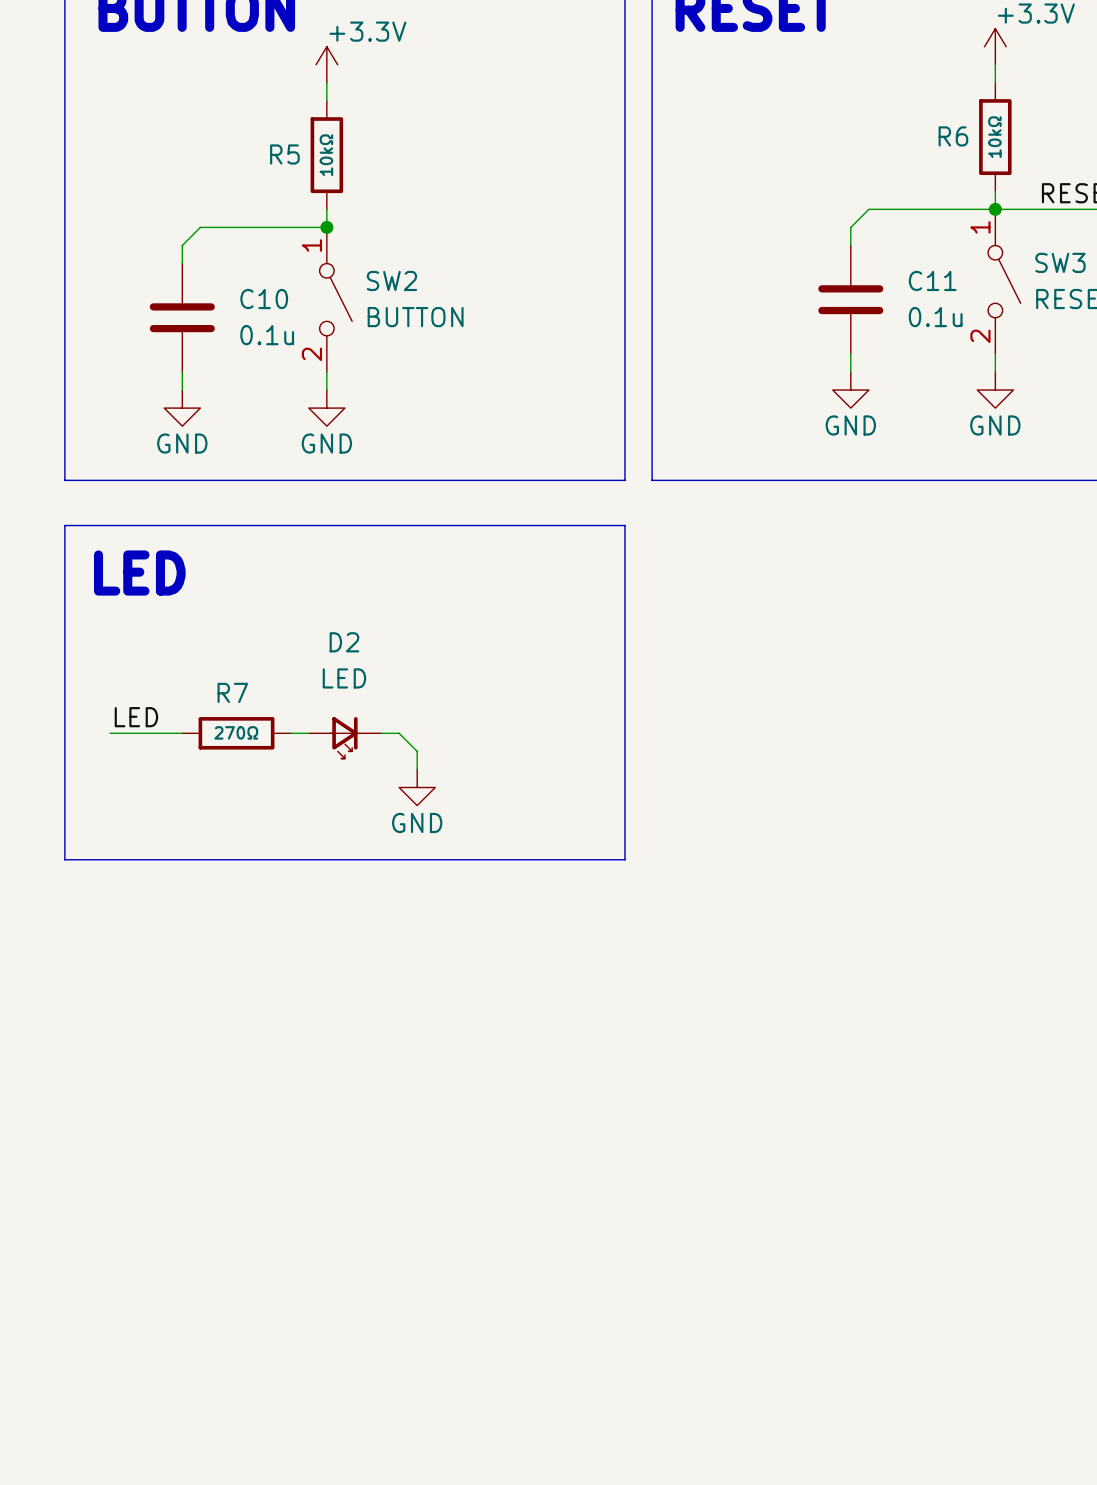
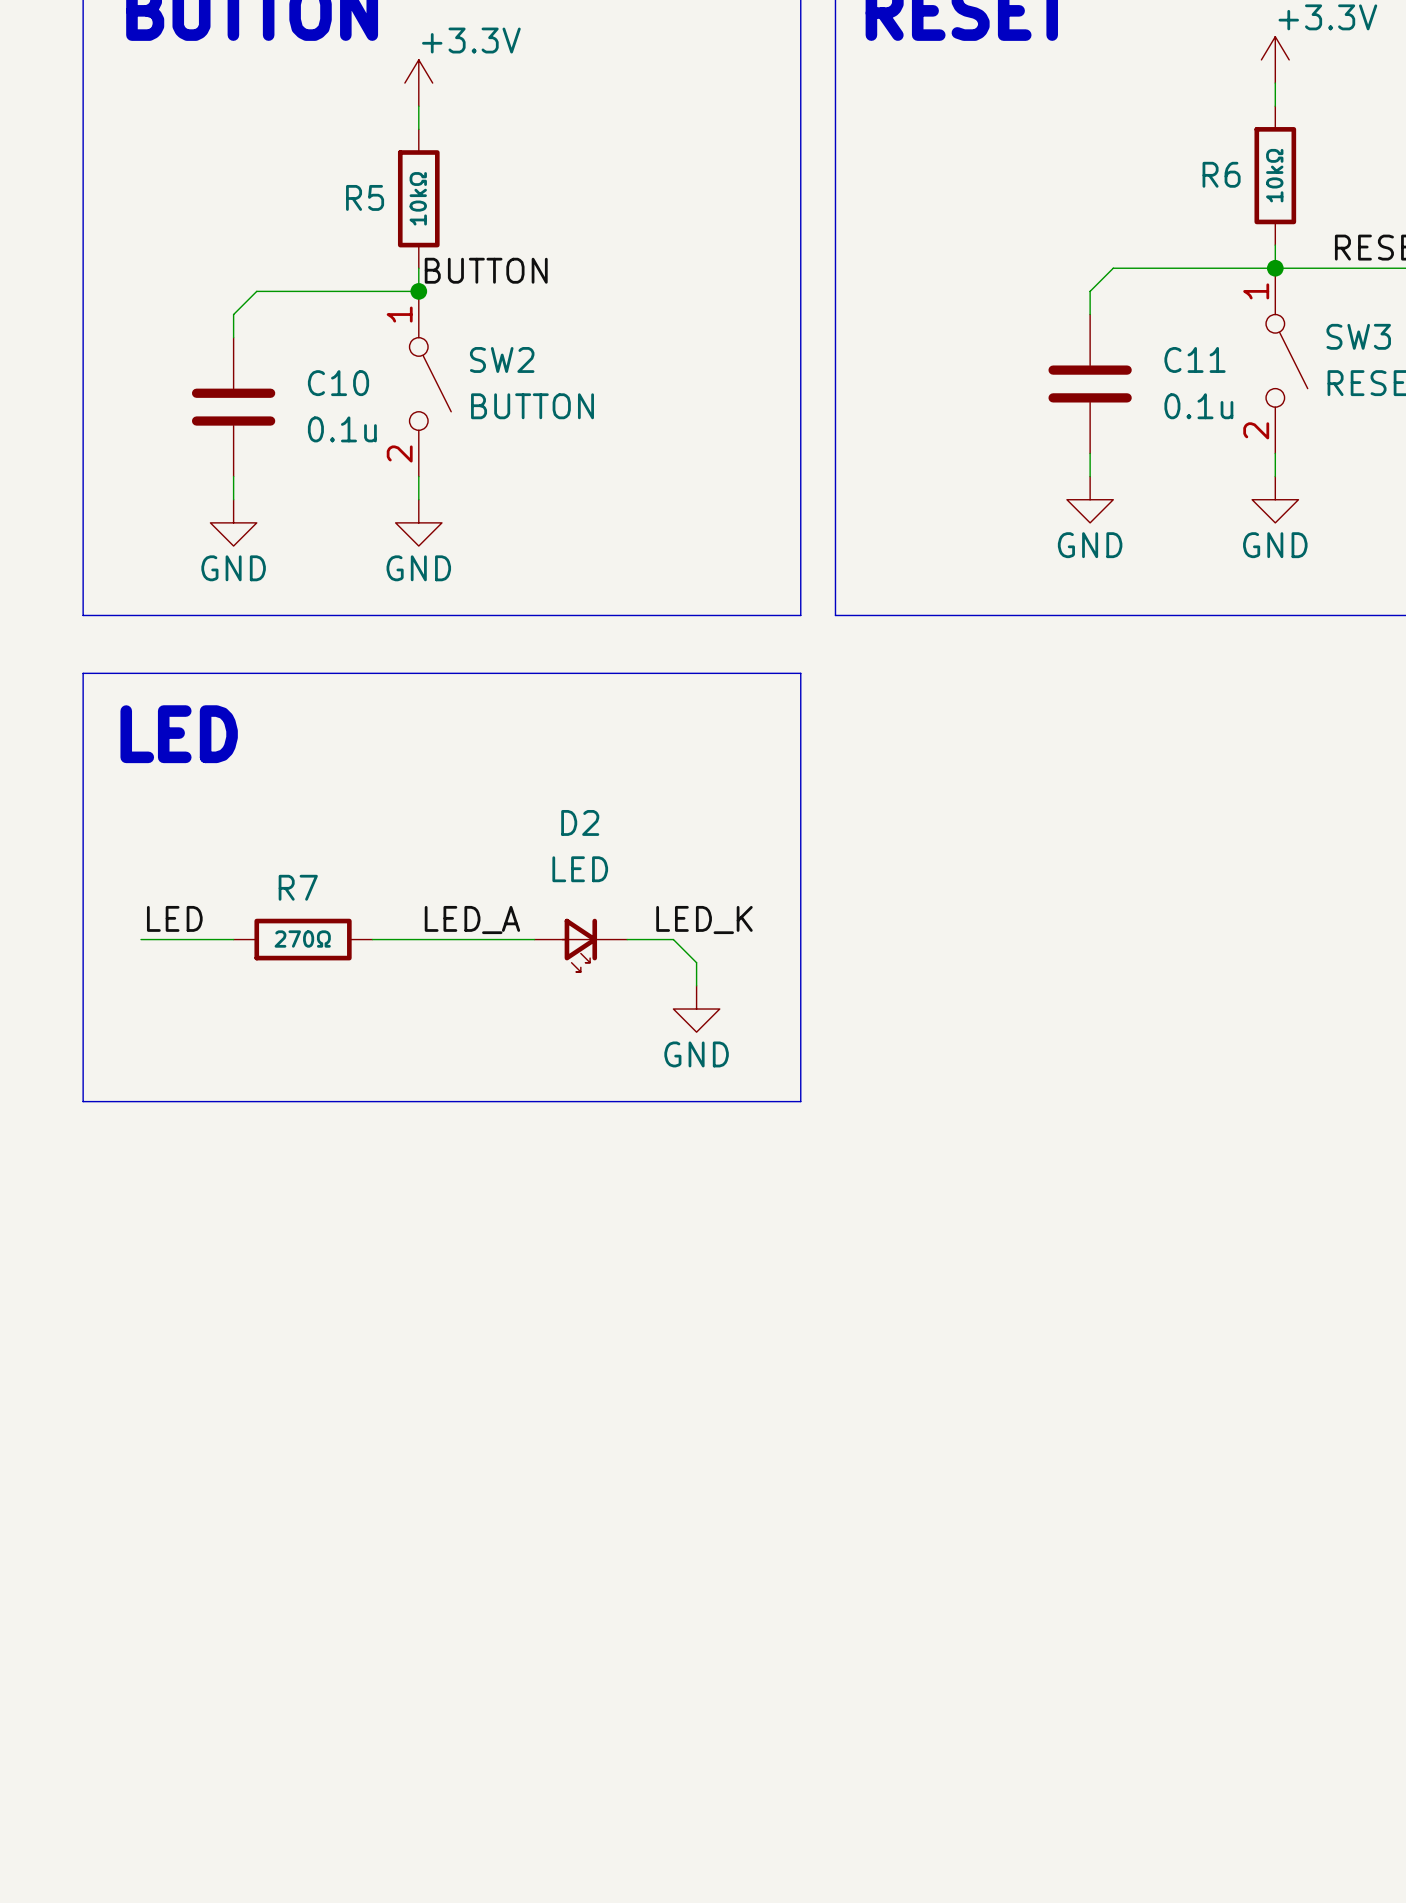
label: none -> BUTTON (486, 270)
label: none -> LED_A (472, 920)
label: none -> LED_K (704, 920)
wire: (399, 733) (417, 751) (417, 769) -> (511, 939) (534, 939)
wire: none -> (627, 939) (673, 939) (696, 962) (696, 985)
D2 position: (344, 737) -> (580, 945)
power symbol position: GND (417, 787) -> GND (696, 1009)

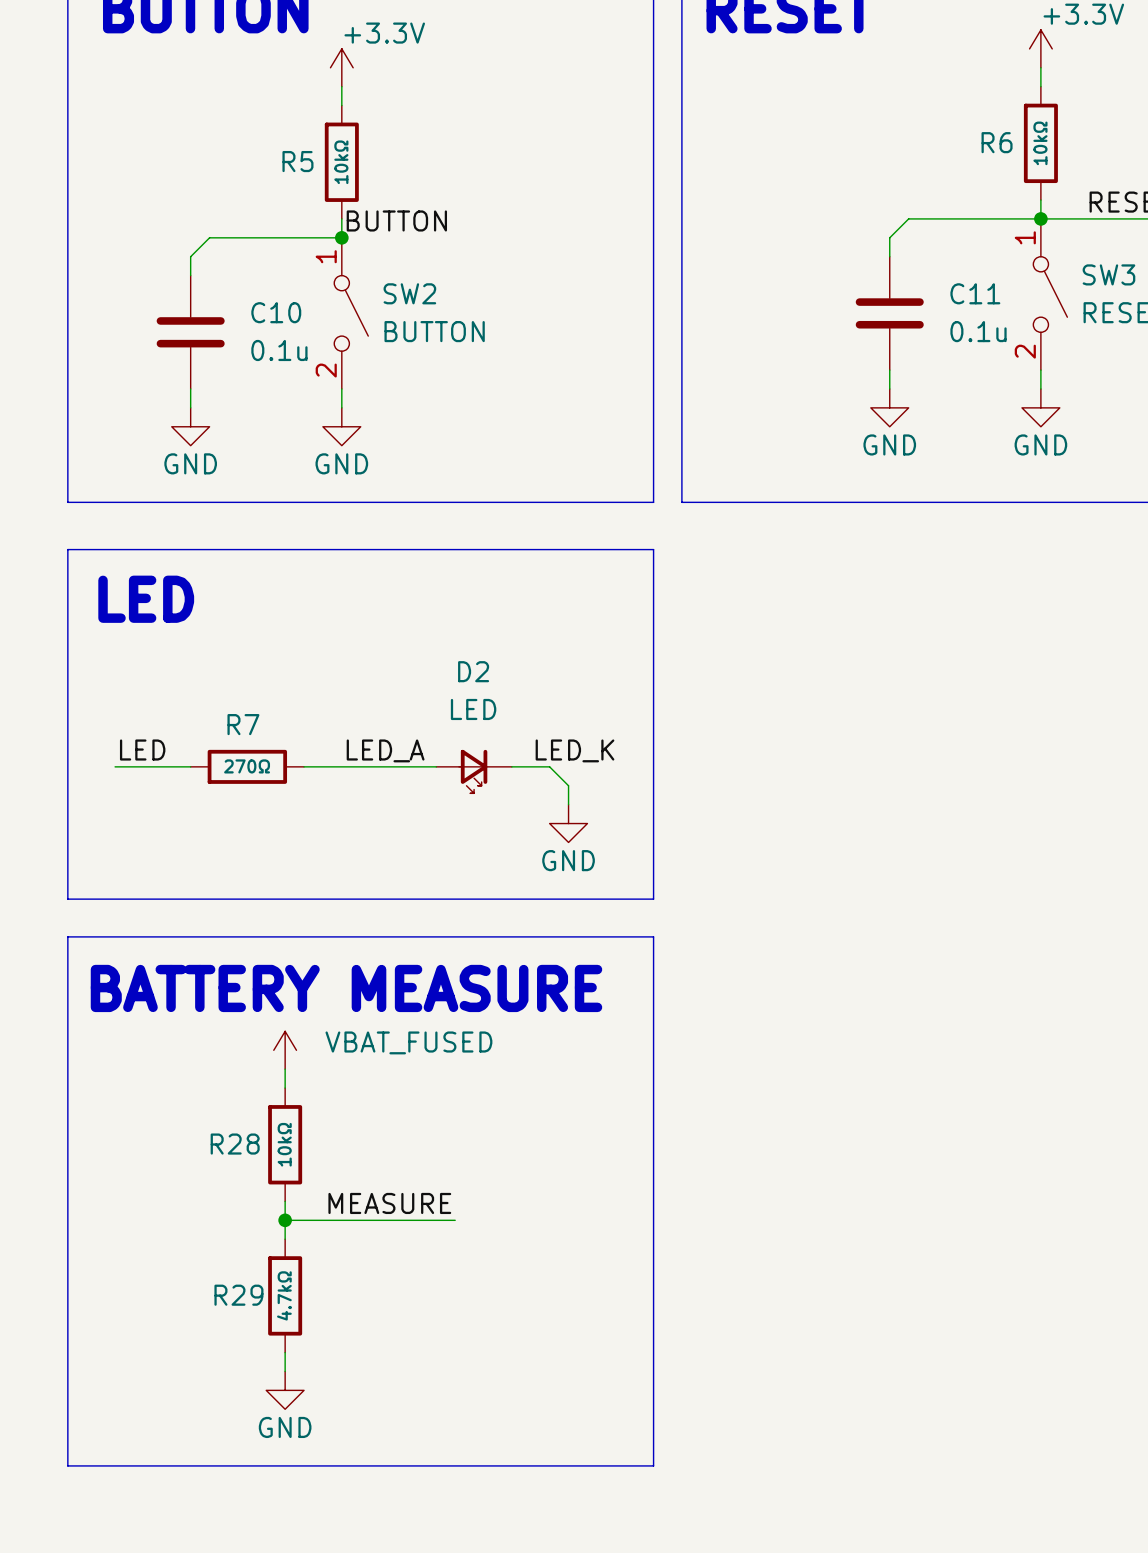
line: none -> (67, 936) (653, 936) (653, 1465) (67, 1465) (67, 936)
text: none -> BATTERY MEASURE (346, 988)
power symbol: none -> VBAT_FUSED (285, 1050)
wire: none -> (285, 1069) (285, 1088)
R28: none -> 10kΩ (285, 1144)
wire: none -> (285, 1201) (285, 1239)
label: none -> MEASURE (389, 1203)
wire: none -> (285, 1220) (455, 1220)
junction: none -> (285, 1220)
R29: none -> 4.7kΩ (285, 1295)
wire: none -> (285, 1352) (285, 1371)
power symbol: none -> GND (285, 1390)

